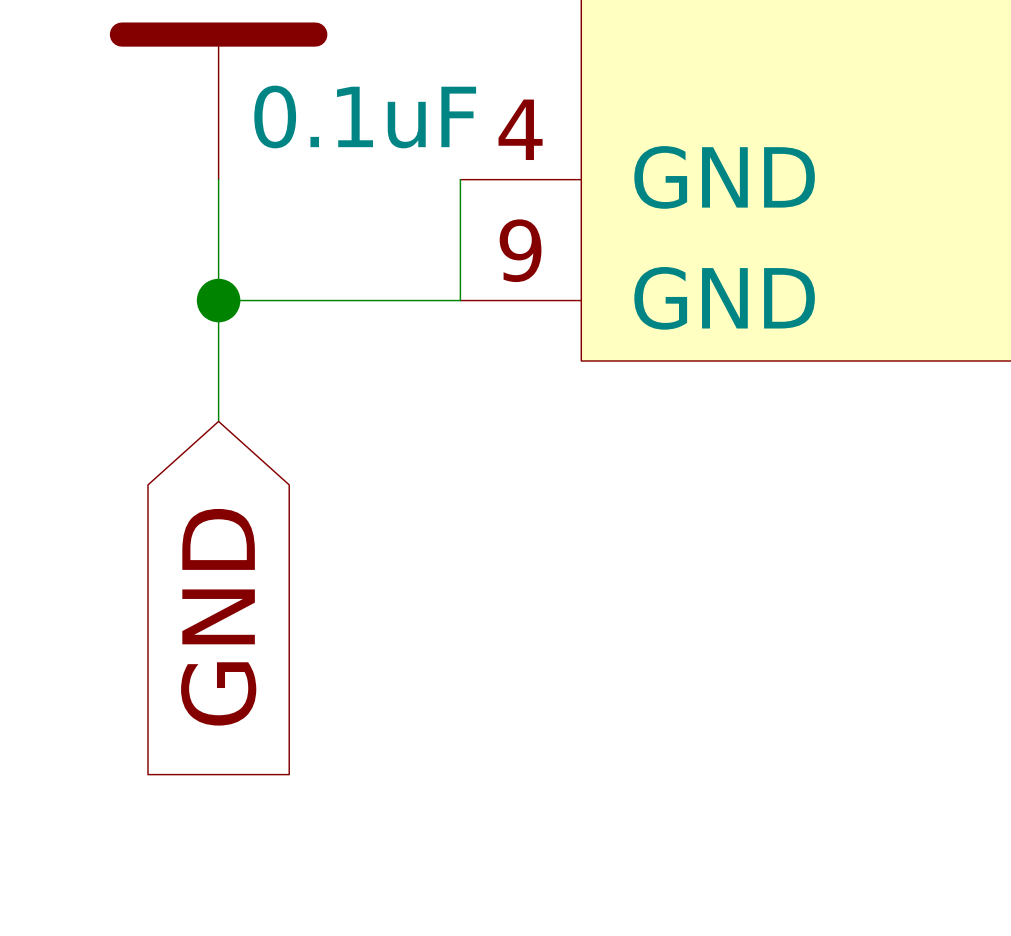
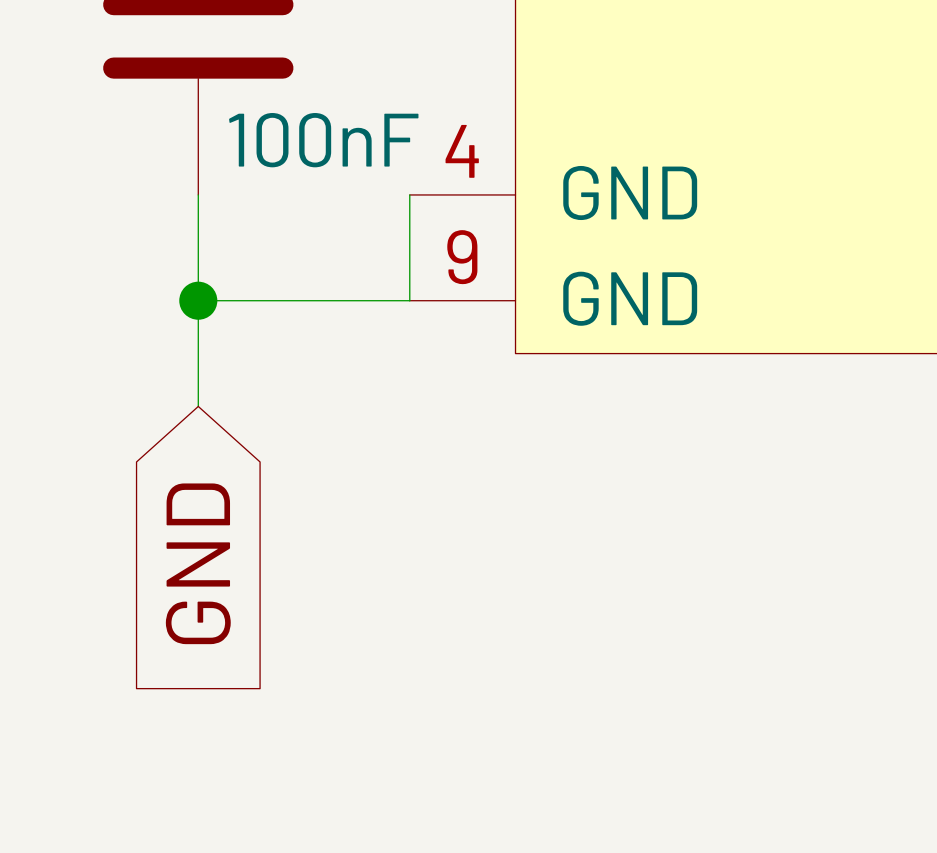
part value: 0.1uF (365, 116) -> 100nF (323, 140)

